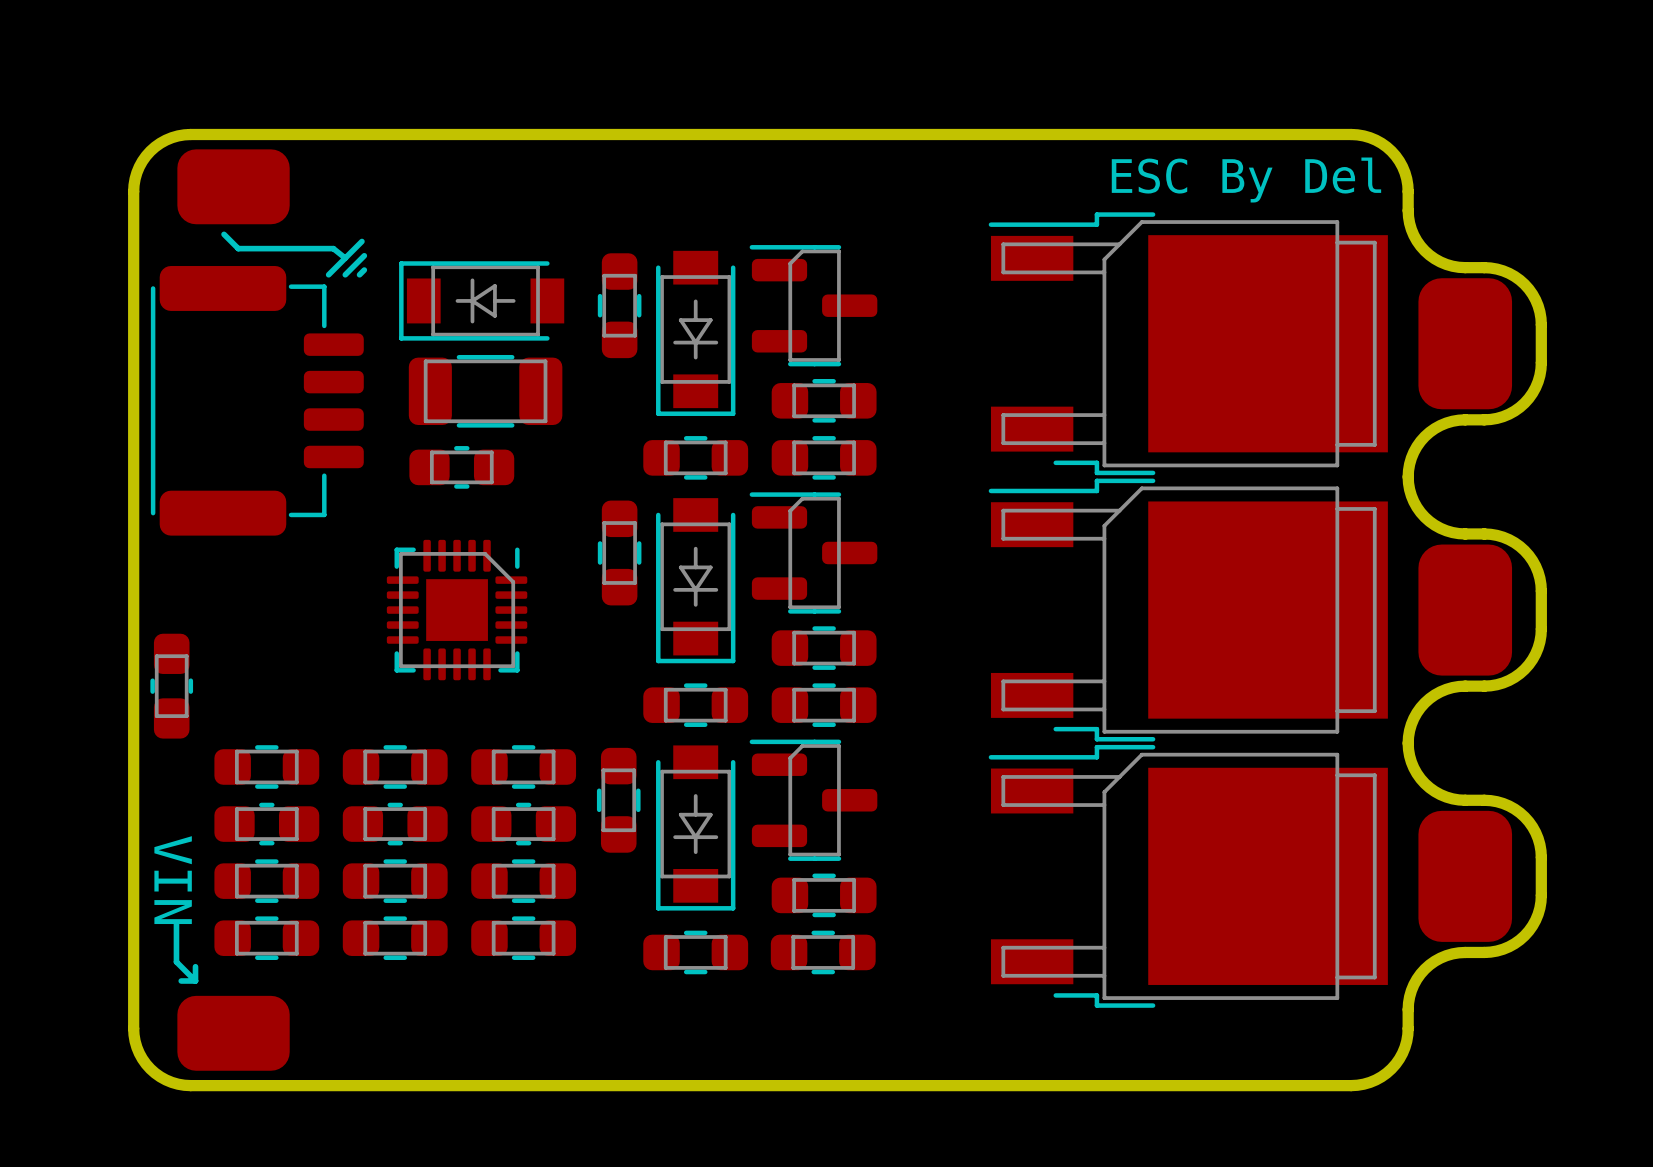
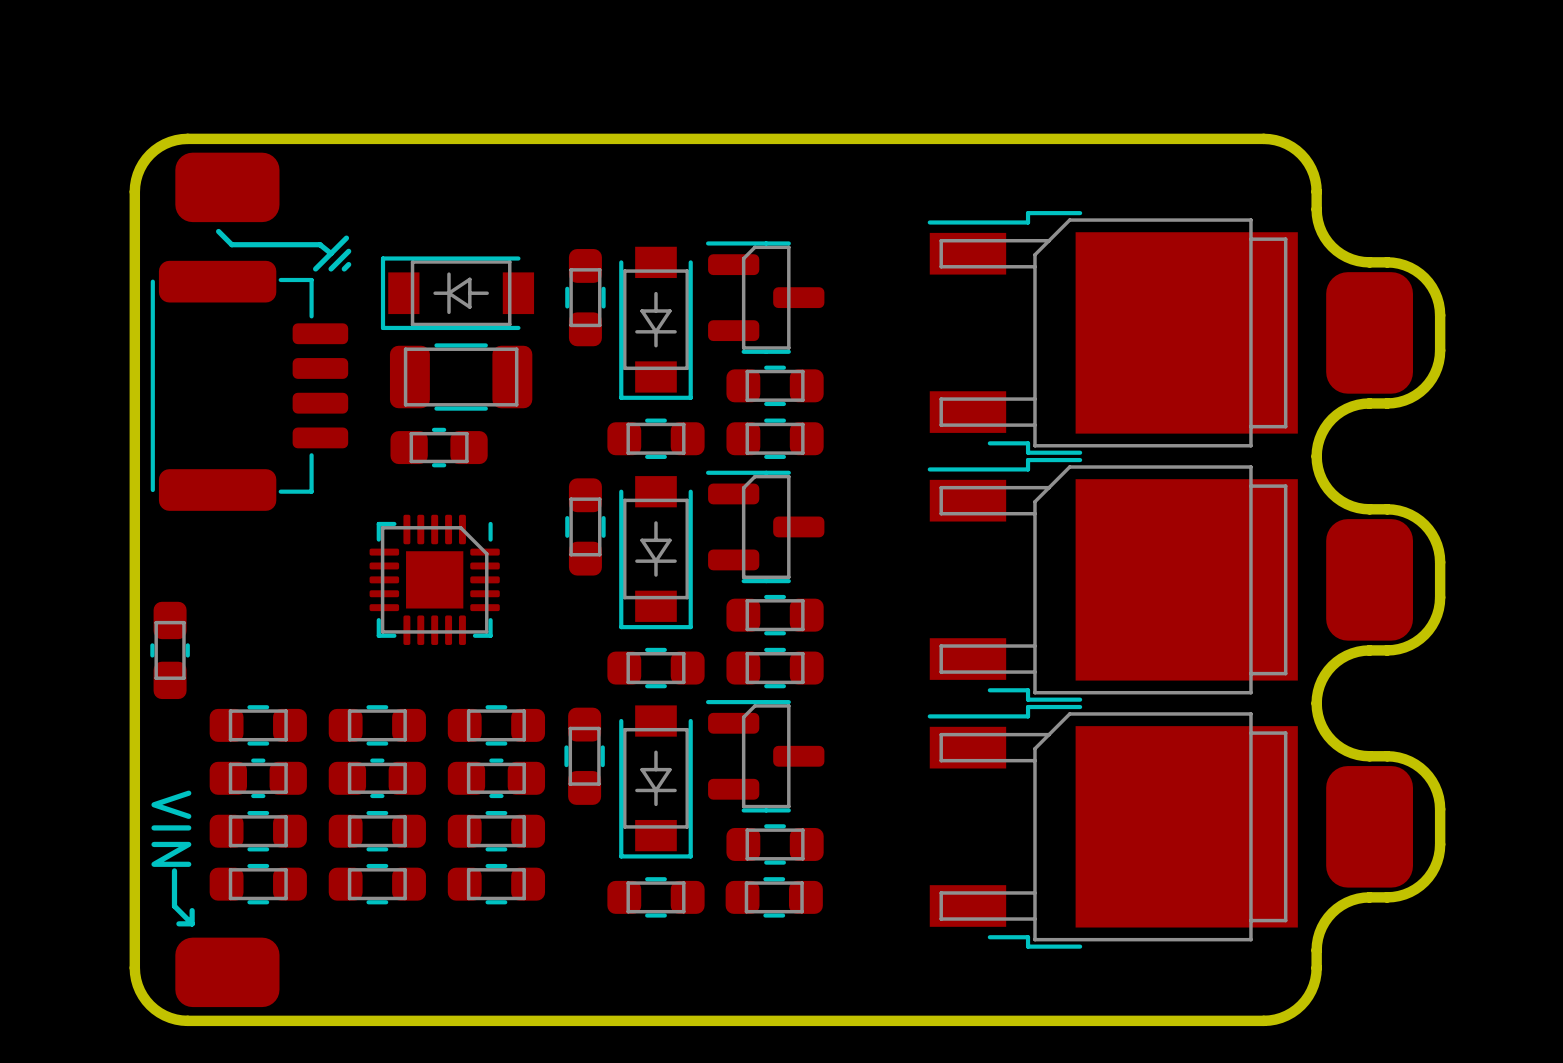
text: ESC By Del (1246, 180) -> none

